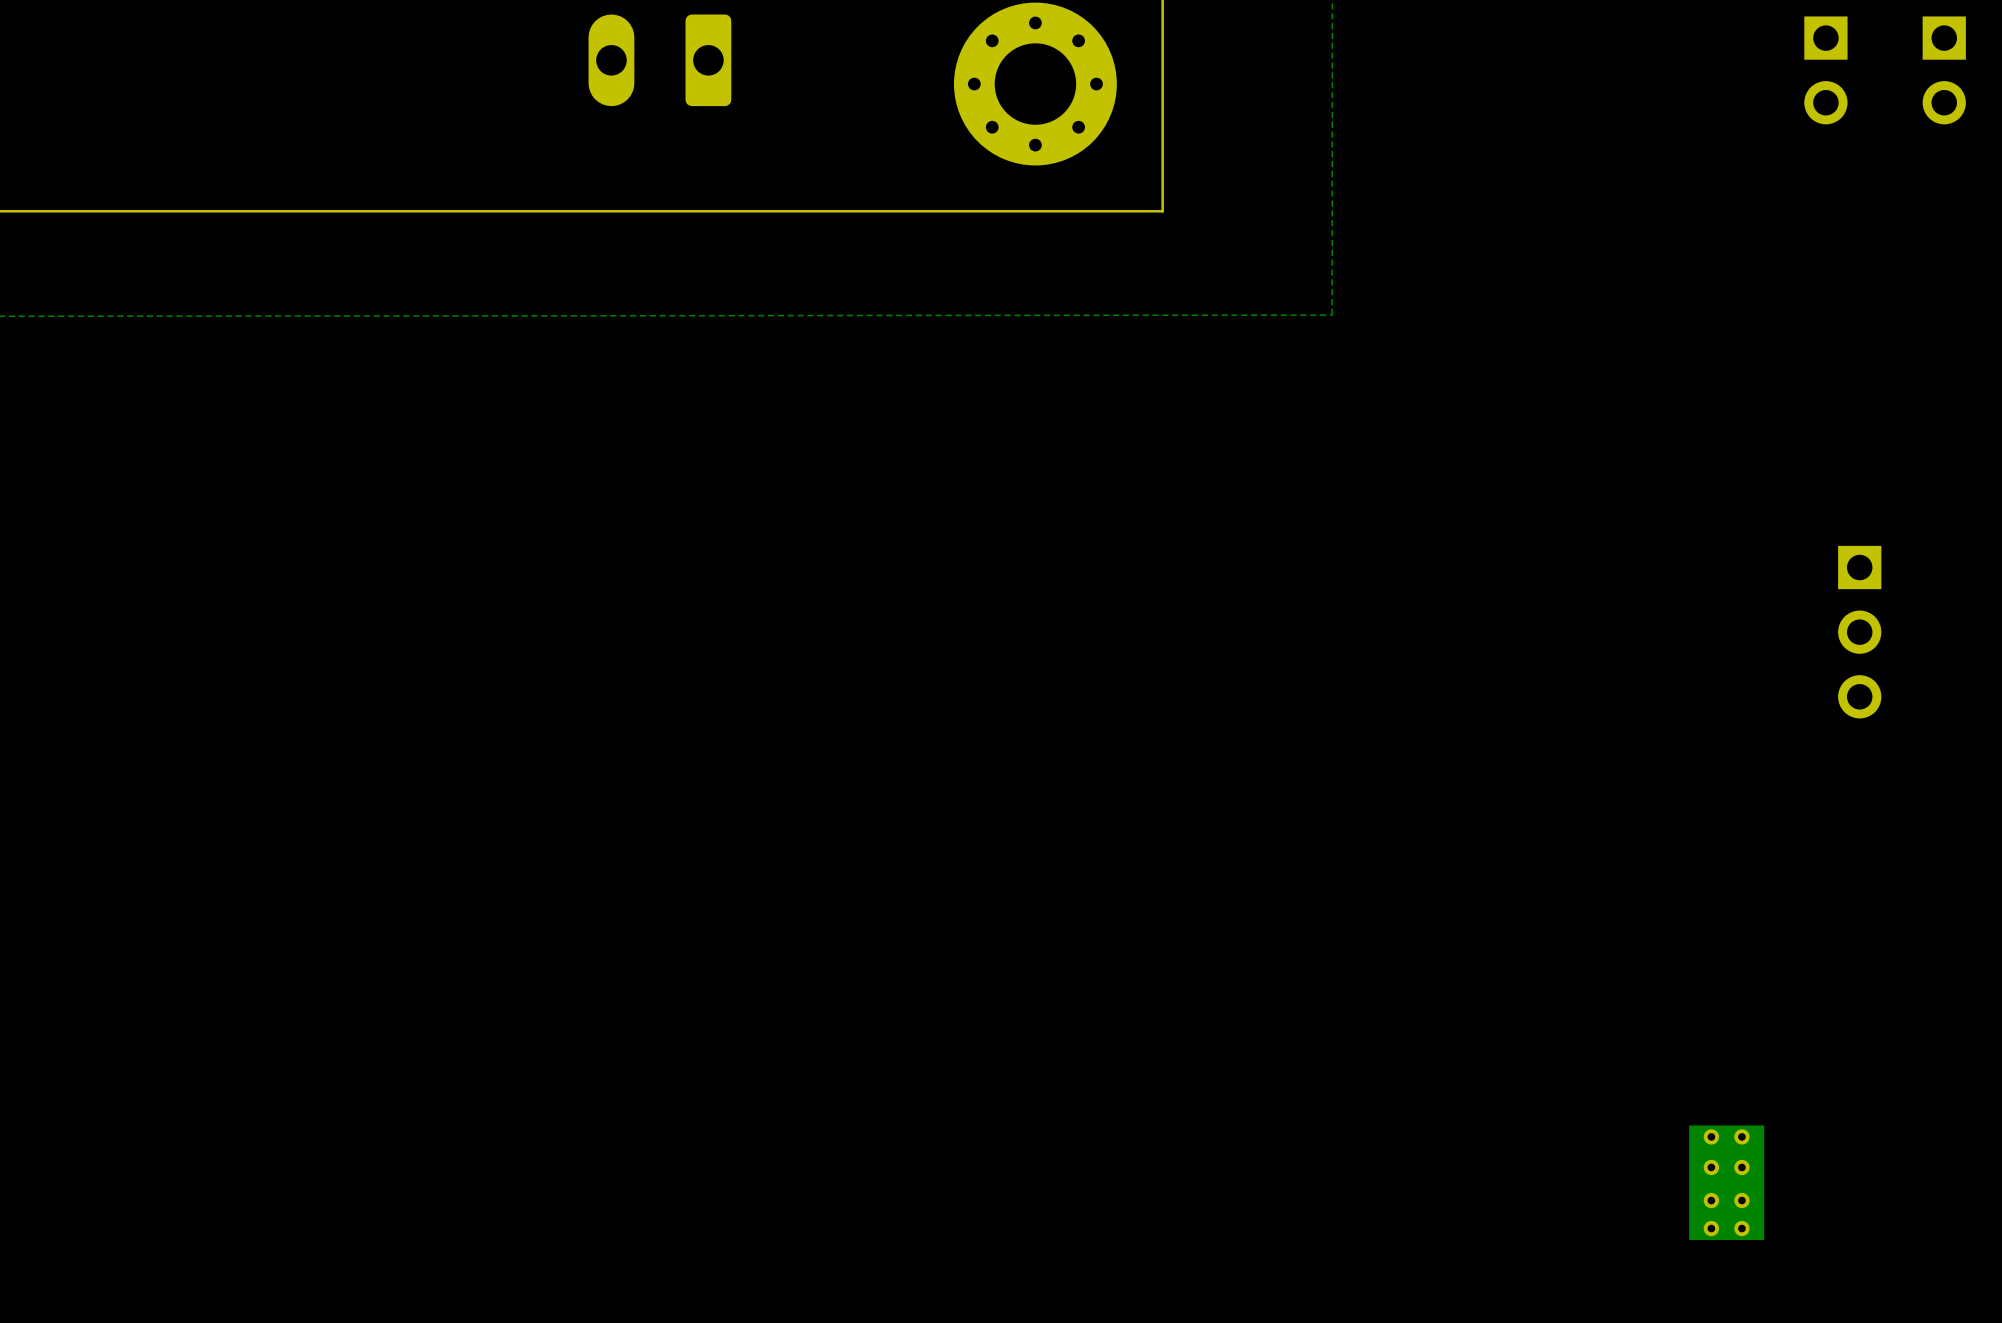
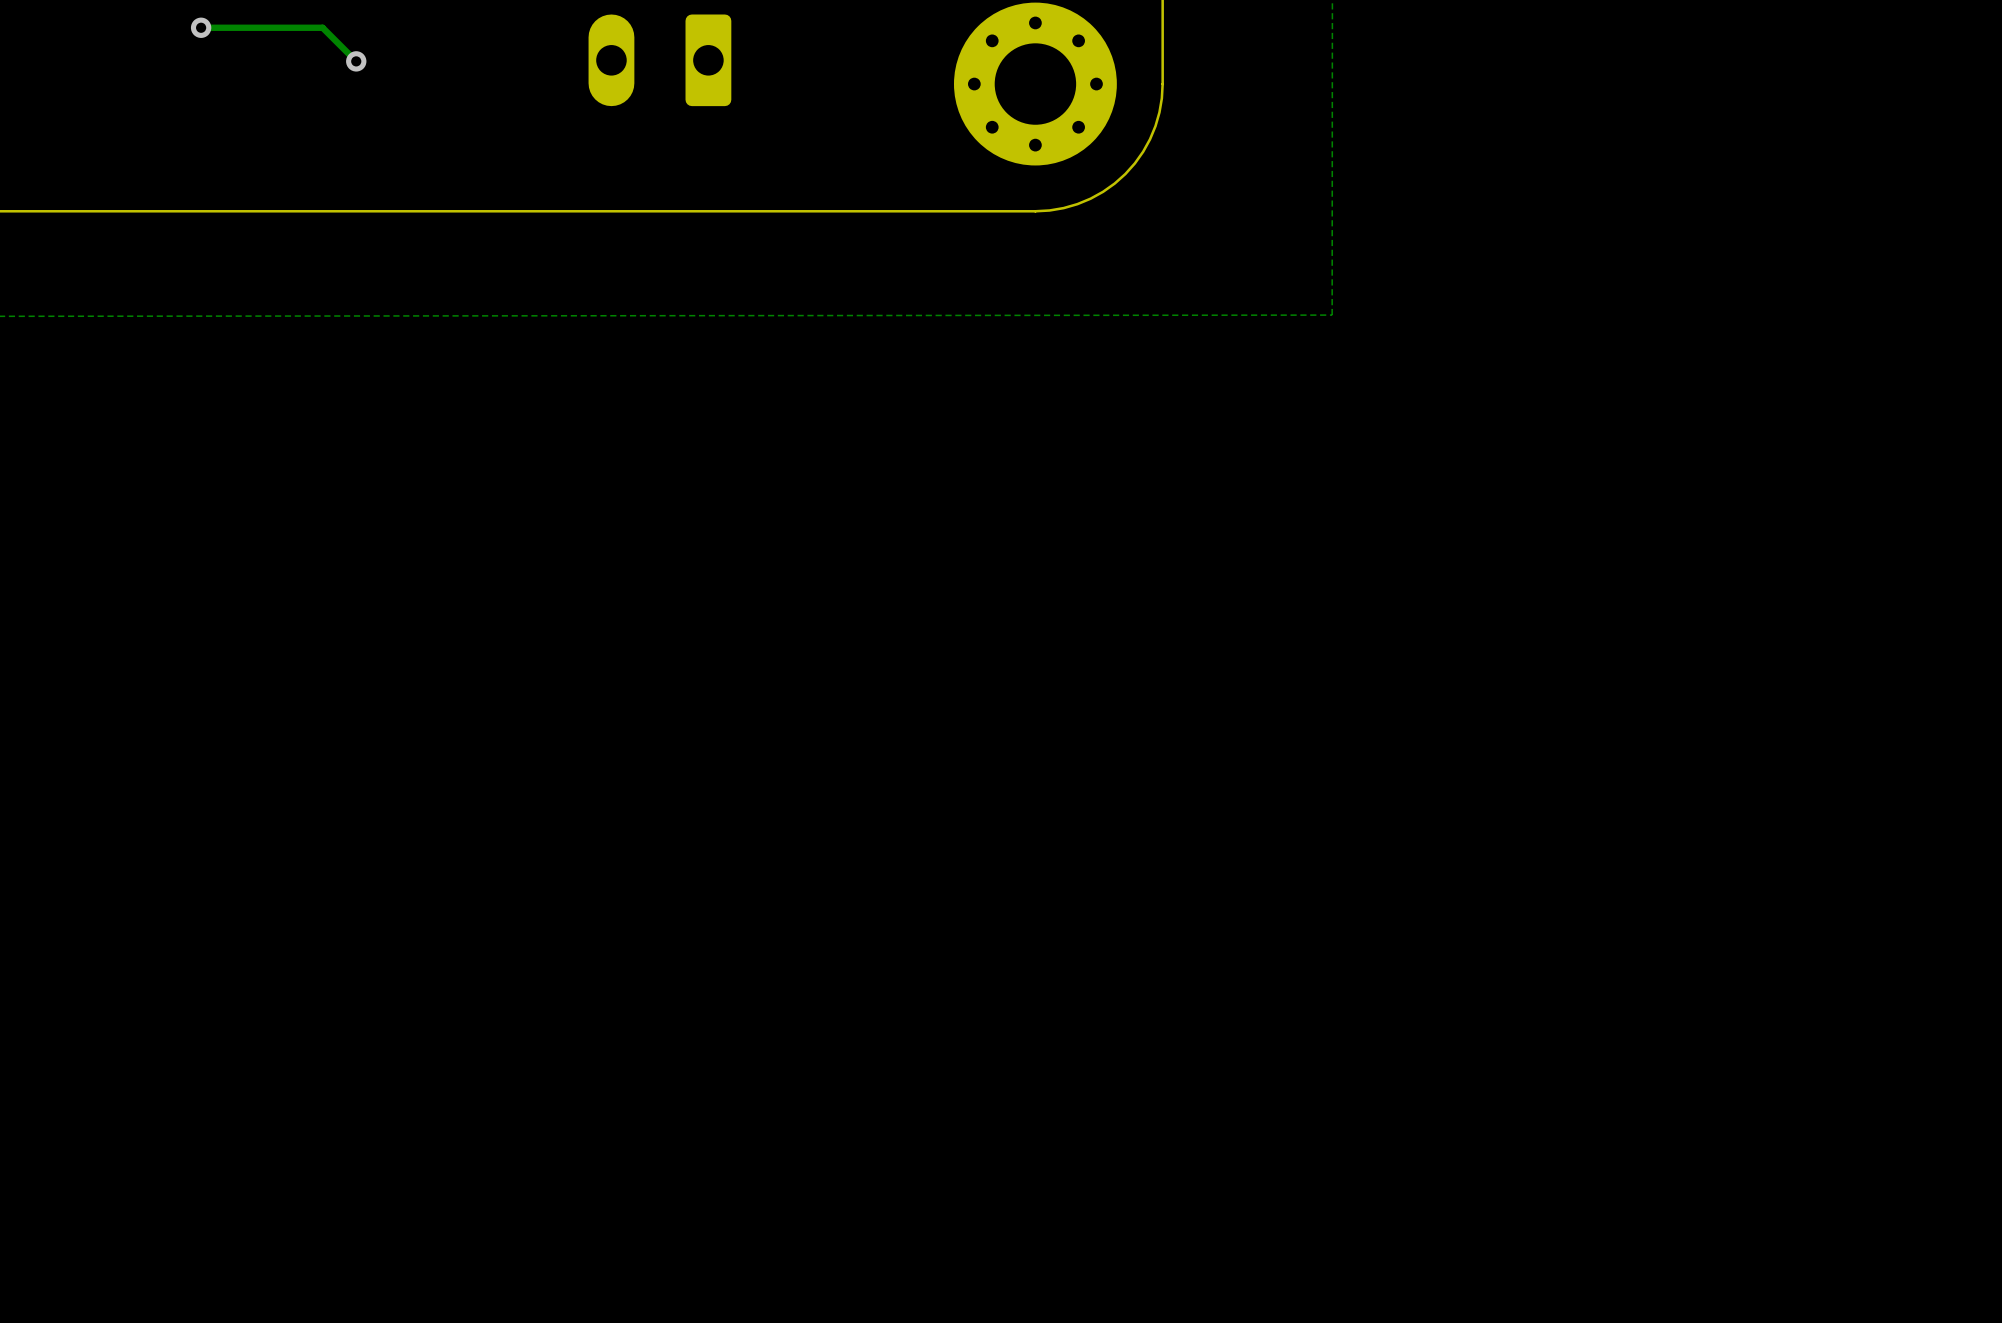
track: none -> (201, 27) (322, 27) (356, 61)
via: none -> (201, 27)
via: none -> (356, 61)
part: (1825, 70) -> none
part: (1944, 70) -> none
board edge: (1162, 84) (1162, 211) (1035, 211) -> (1162, 84) (1161, 98) (1155, 126) (1143, 151) (1125, 174) (1103, 191) (1077, 204) (1049, 210) (1035, 211)
part: (1859, 632) -> none
part: (1726, 1182) -> none

